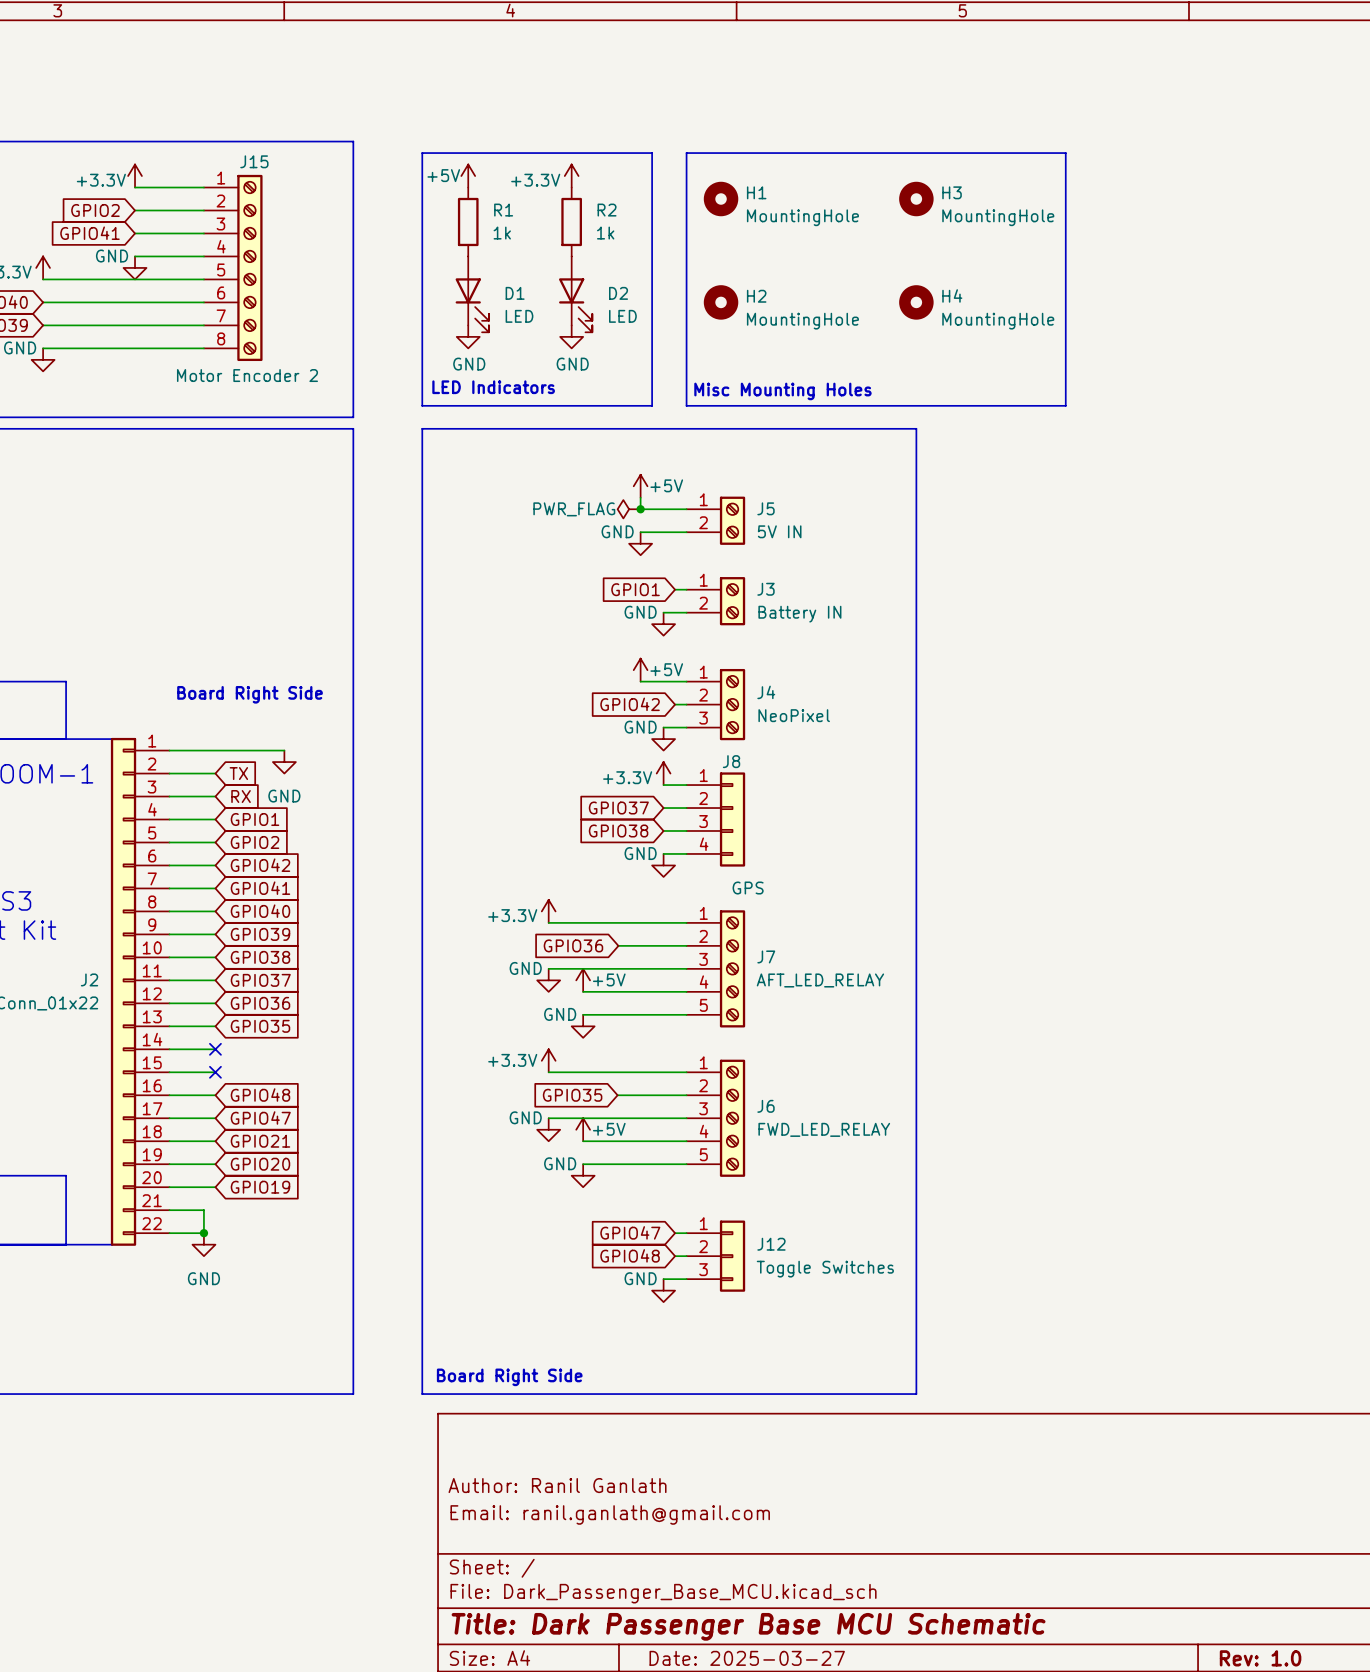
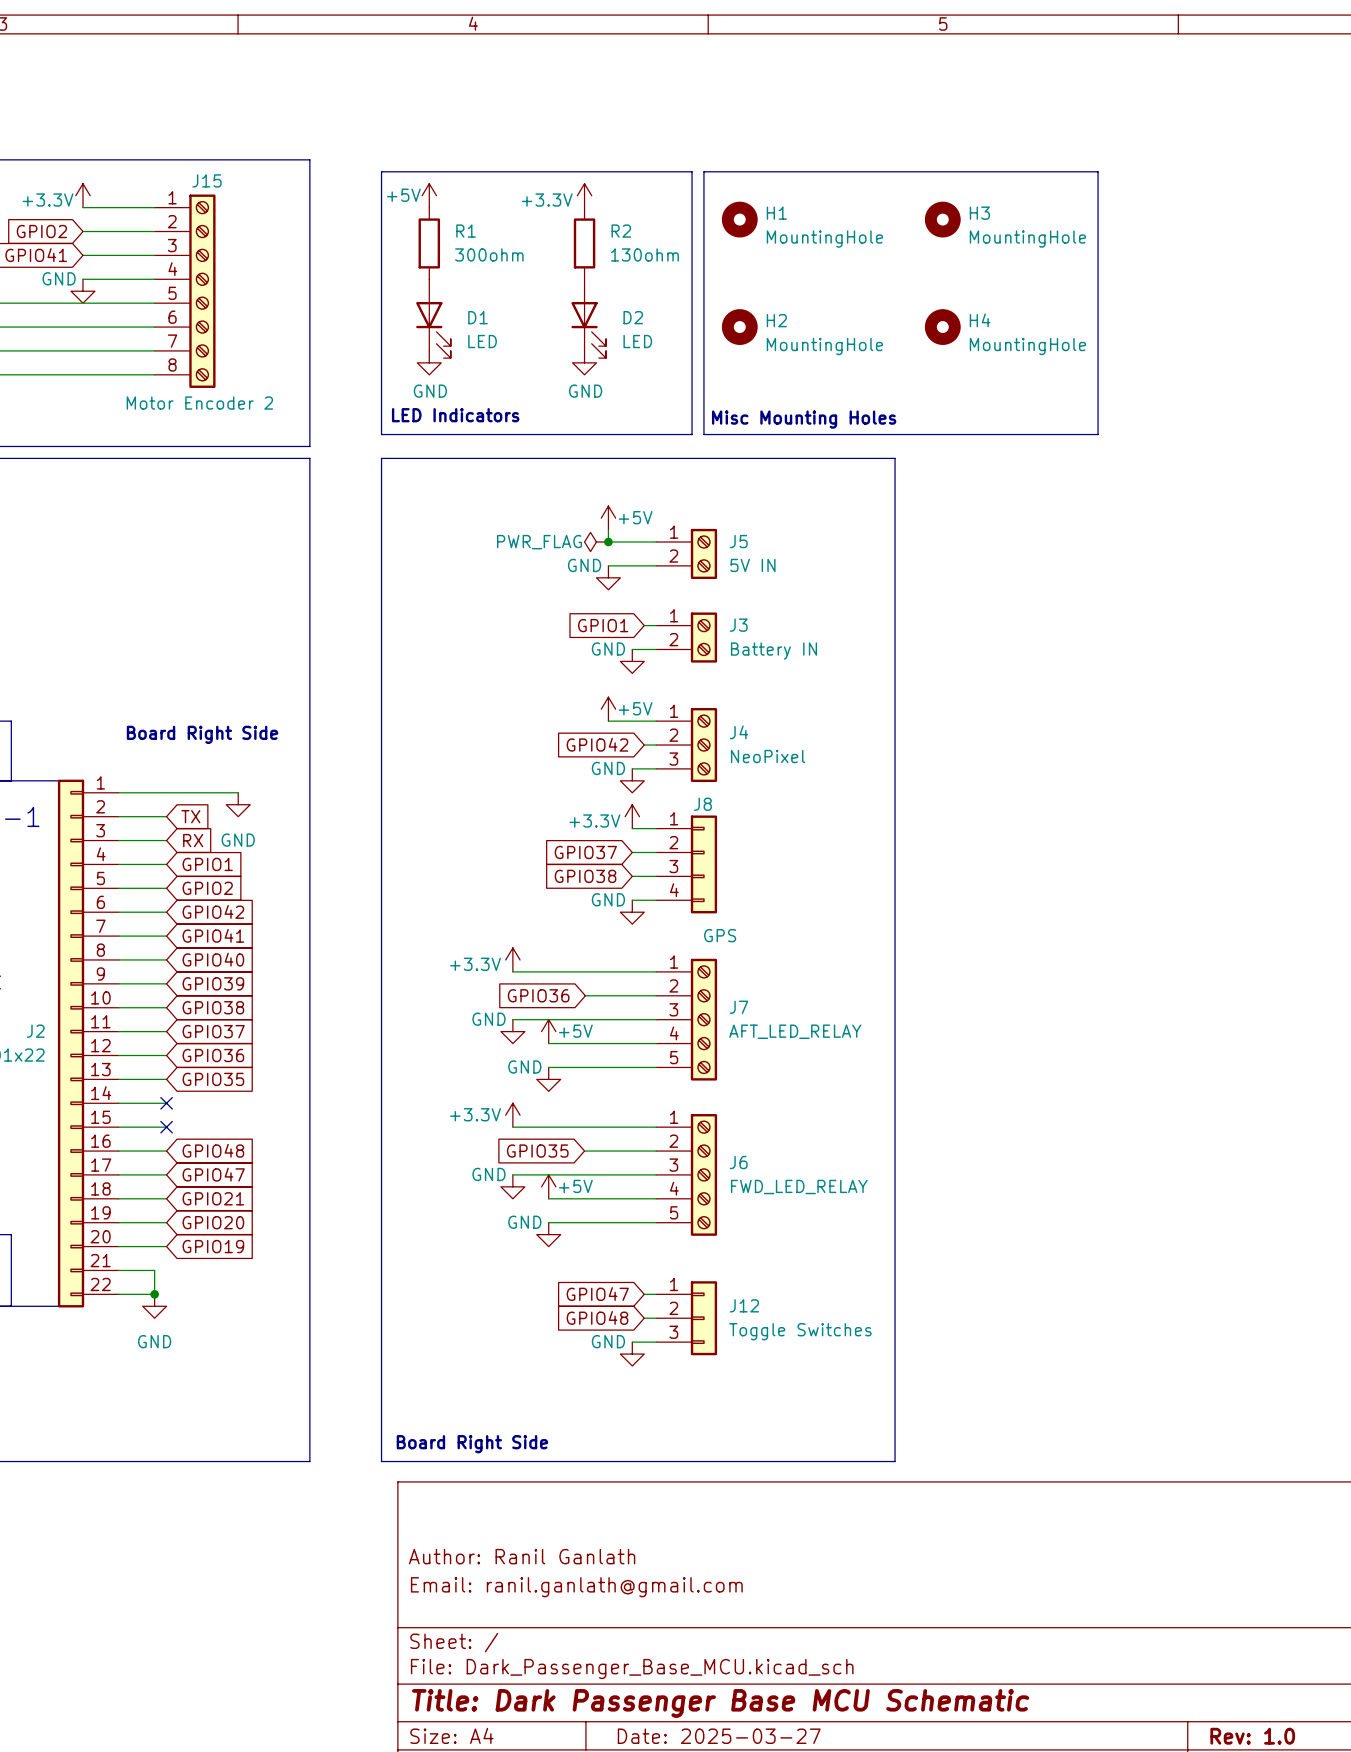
line: (652, 153) (652, 405) -> (620, 171) (656, 171)
line: (686, 153) (686, 405) -> (620, 434) (656, 434)
line: (721, 153) (732, 153) -> (692, 171) (692, 434)
line: (1065, 153) (1065, 405) -> (1050, 171) (1098, 171) (1098, 434) (1050, 434)
power symbol position: +3.3V (571, 176) -> +3.3V (584, 195)
H1 position: (721, 199) -> (739, 219)
H3 position: (916, 199) -> (942, 219)
R2 position: (571, 221) -> (584, 243)
R1 value: 1k (502, 233) -> 300ohm (489, 254)
R2 value: 1k (605, 233) -> 130ohm (644, 254)
D2 position: (575, 294) -> (588, 318)
H2 position: (721, 302) -> (739, 327)
H4 position: (916, 302) -> (942, 327)
power symbol position: GND (571, 336) -> GND (584, 362)
text position: Misc Mounting Holes (782, 391) -> Misc Mounting Holes (804, 419)
line: (721, 405) (732, 405) -> (703, 171) (703, 434)

